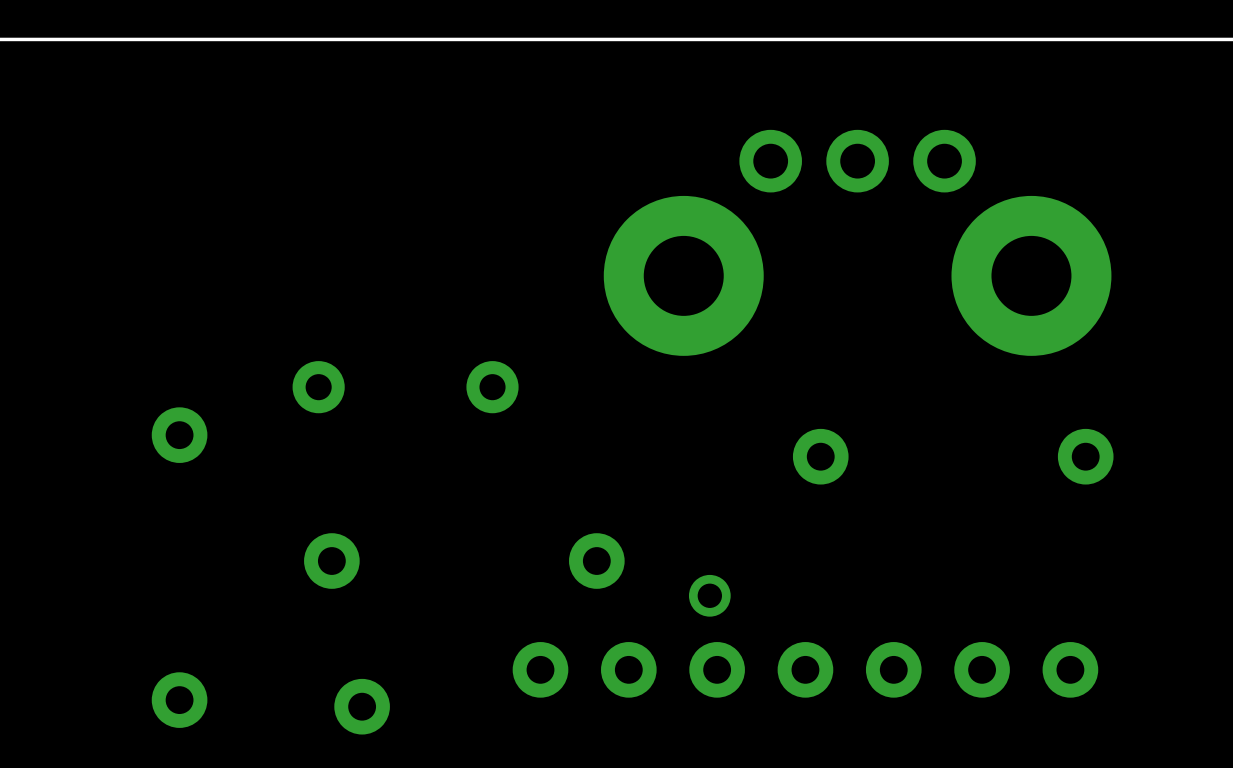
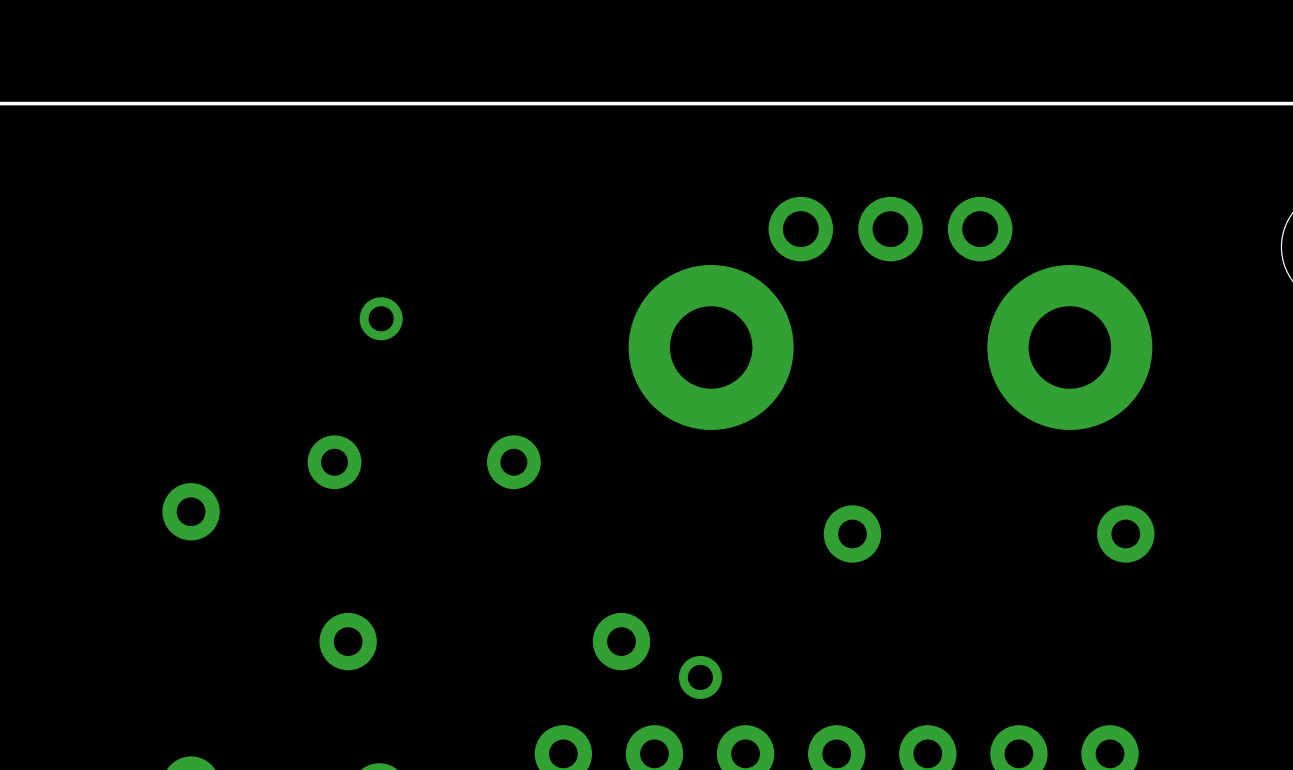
via: none -> (381, 318)
via position: (709, 595) -> (700, 677)

